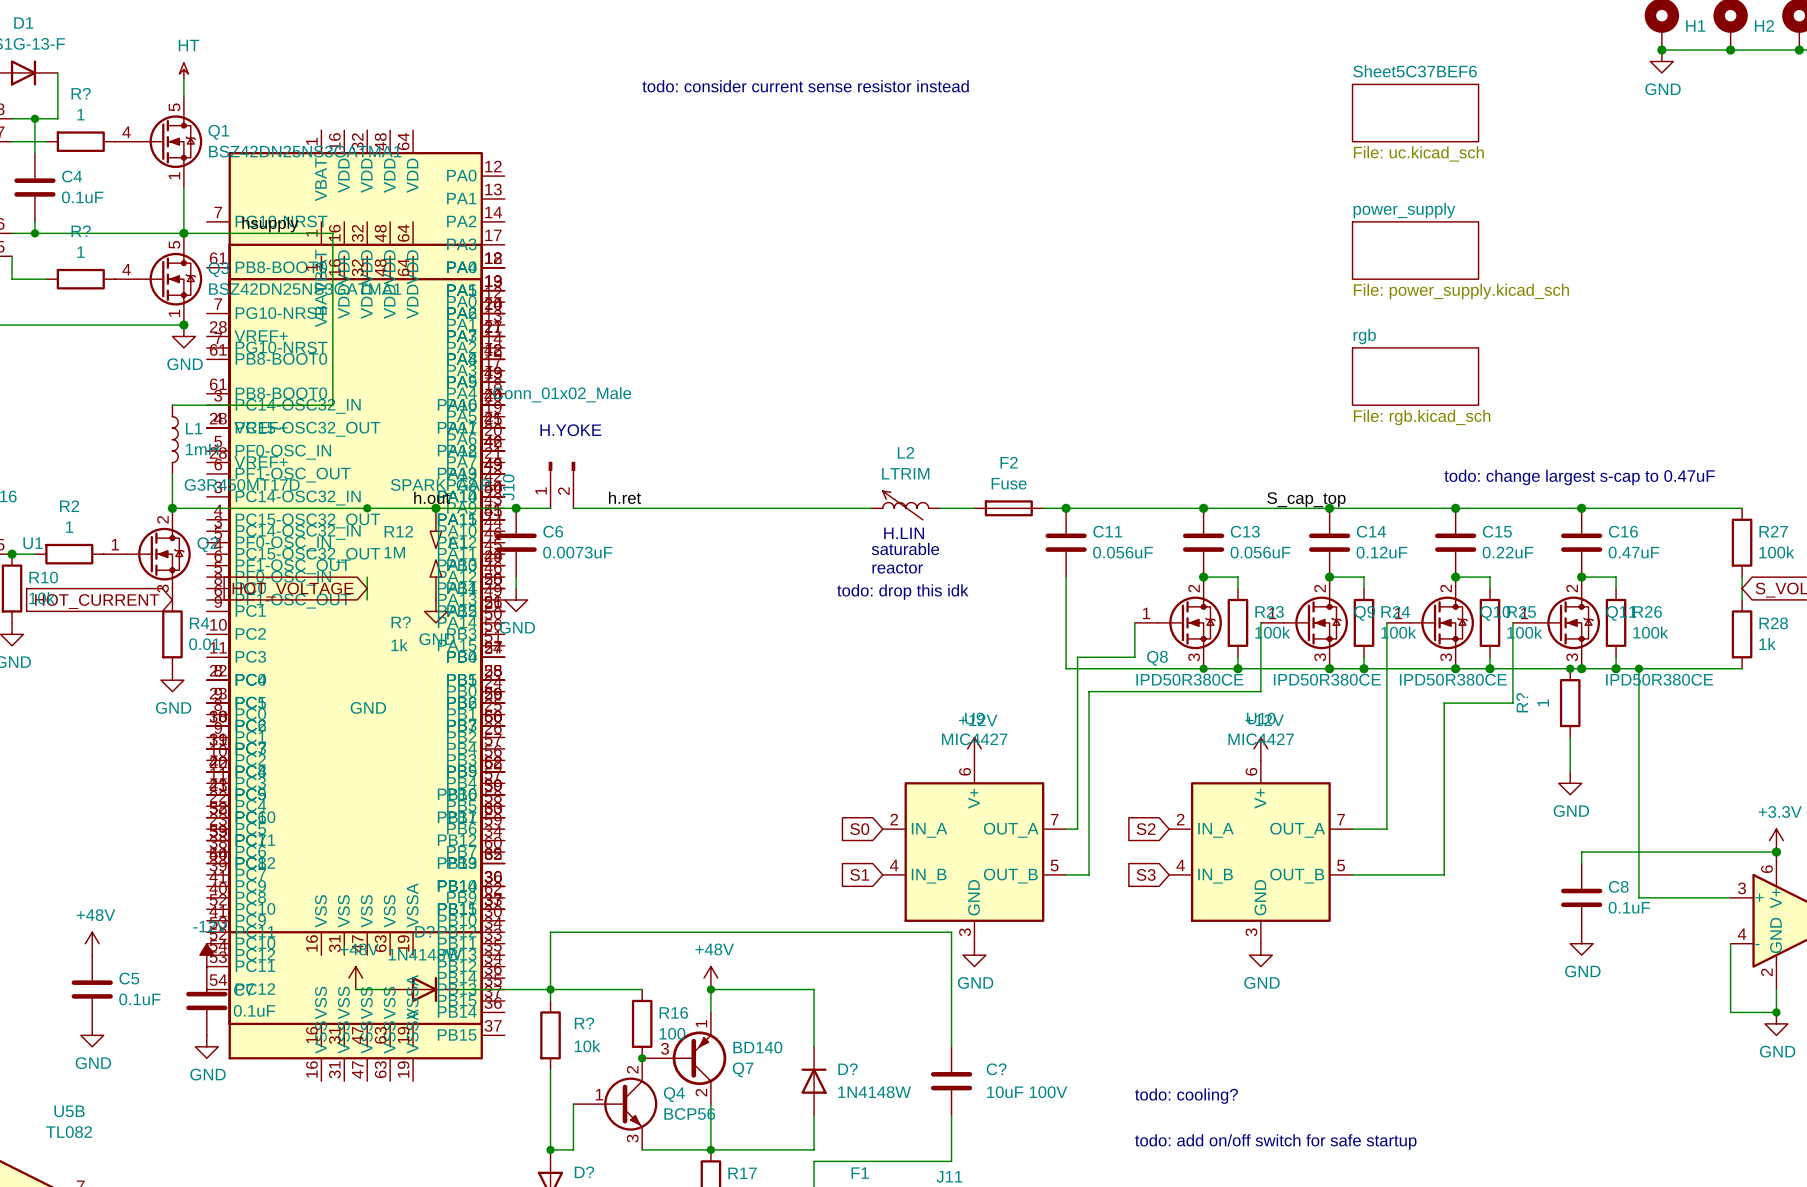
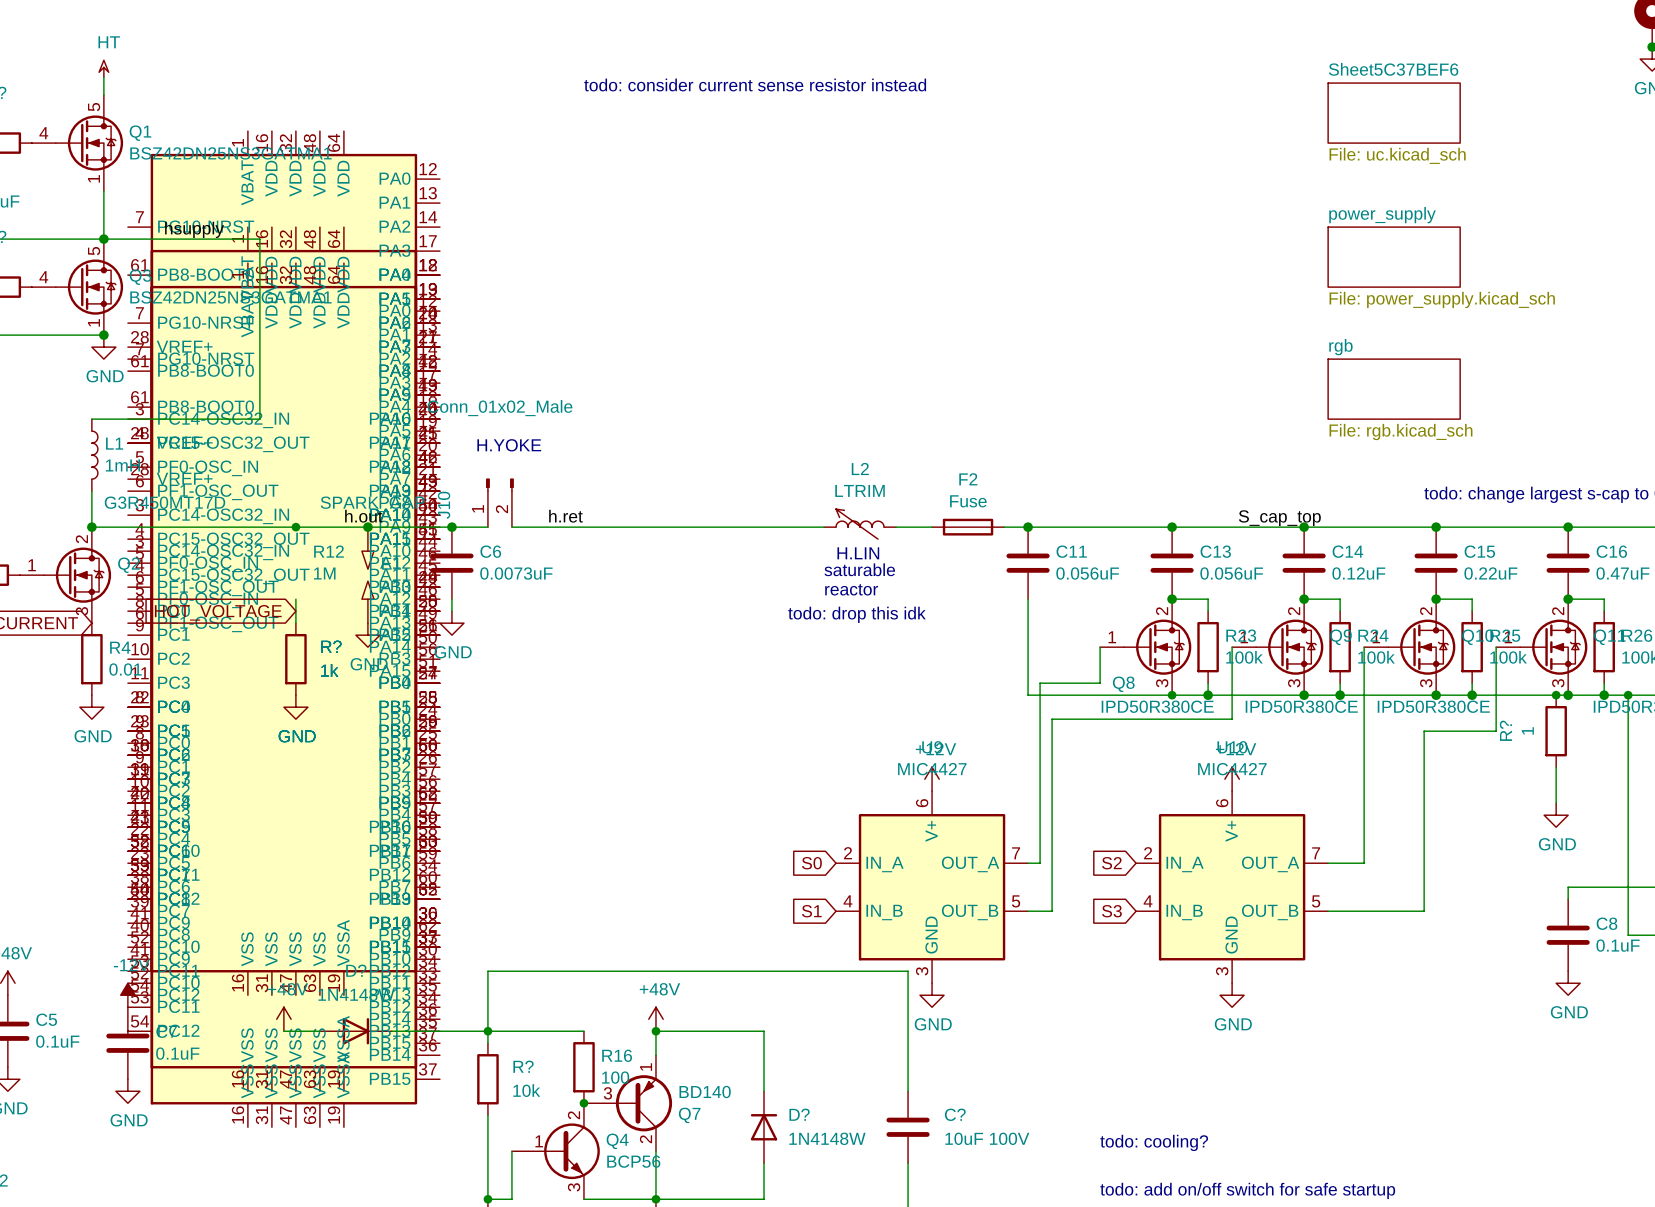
R?: none -> 1k (295, 659)
power symbol: none -> GND (295, 707)

